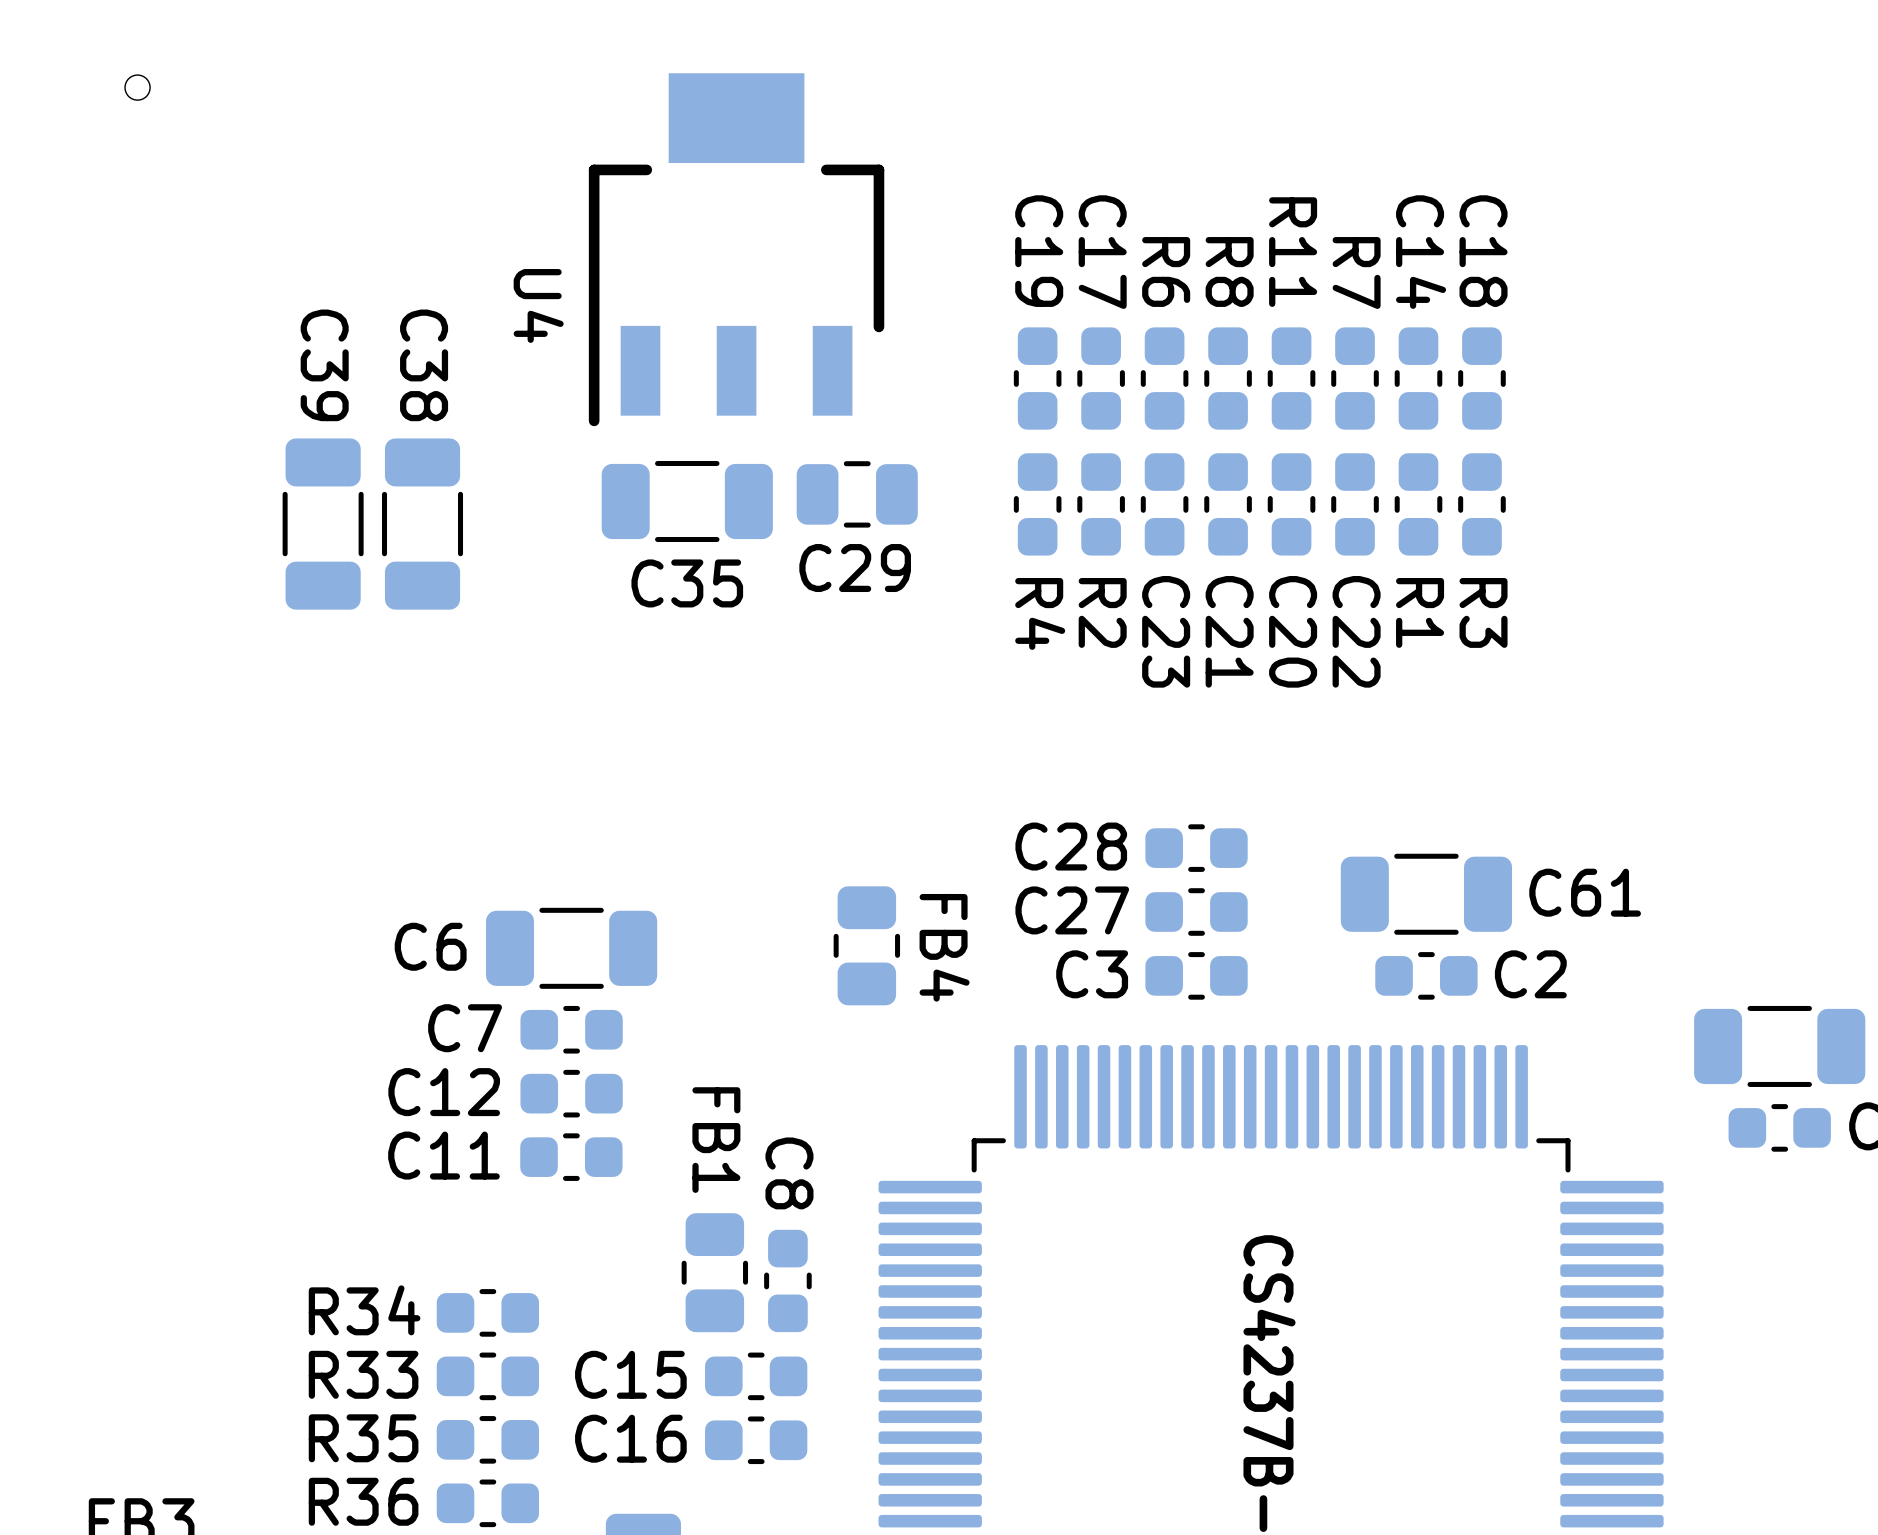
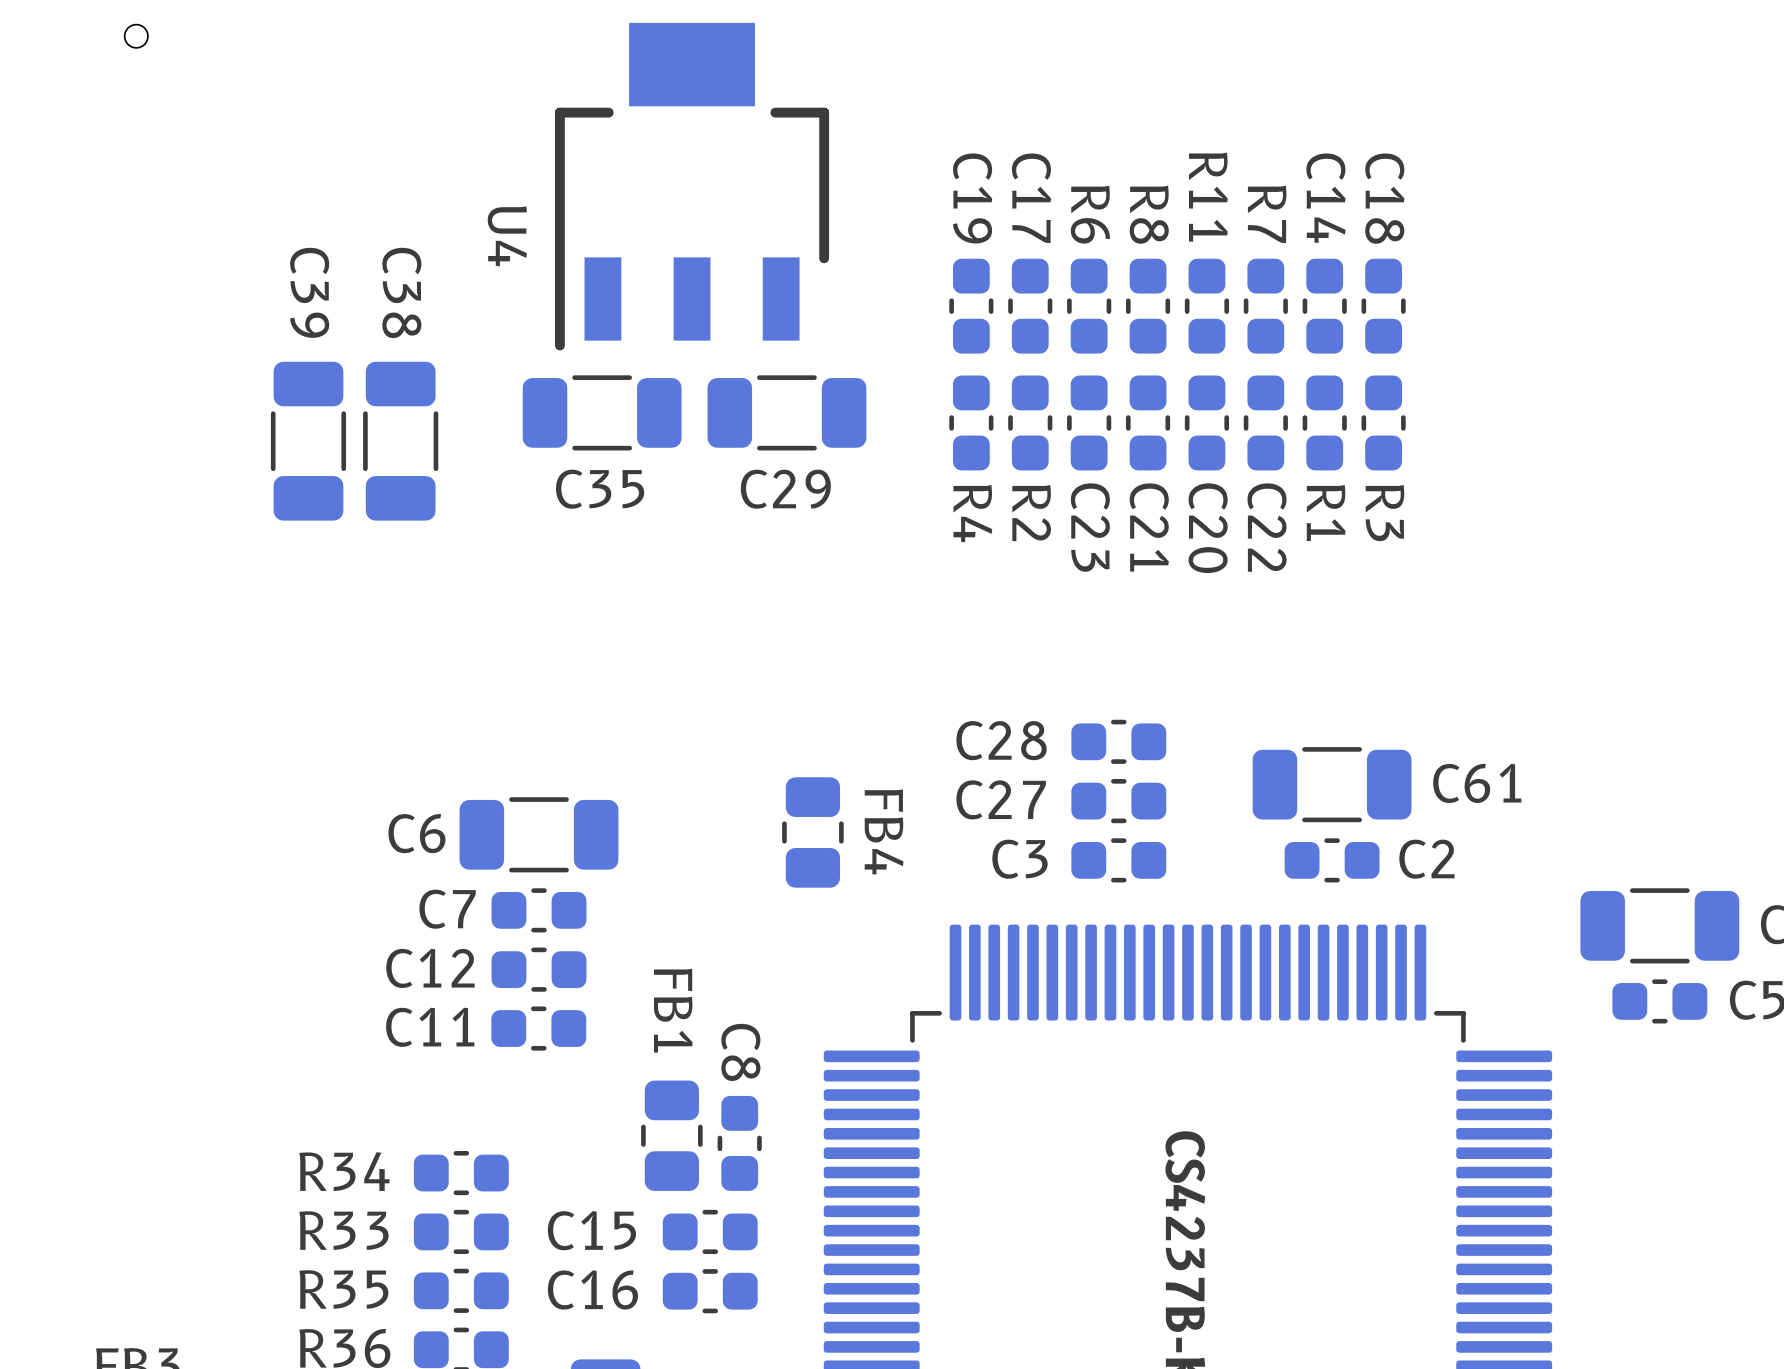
C29 footprint: [796, 461, 918, 528] -> [707, 375, 867, 451]
C35 position: (687, 501) -> (602, 412)

